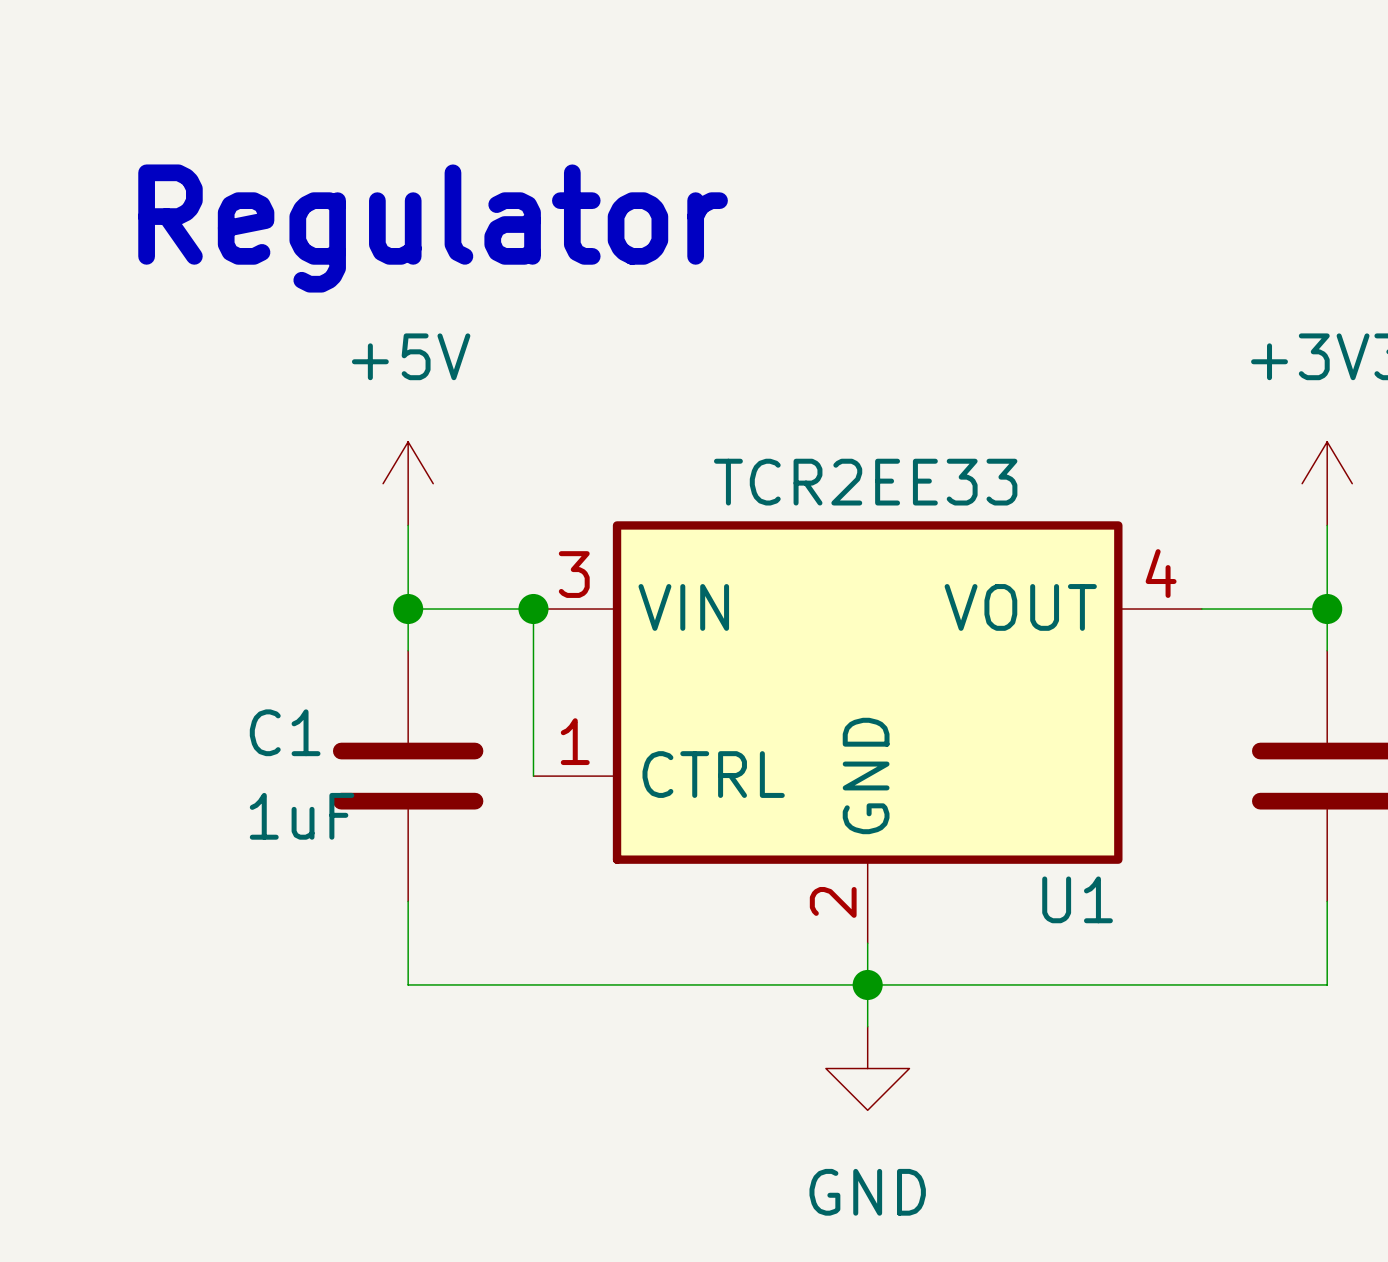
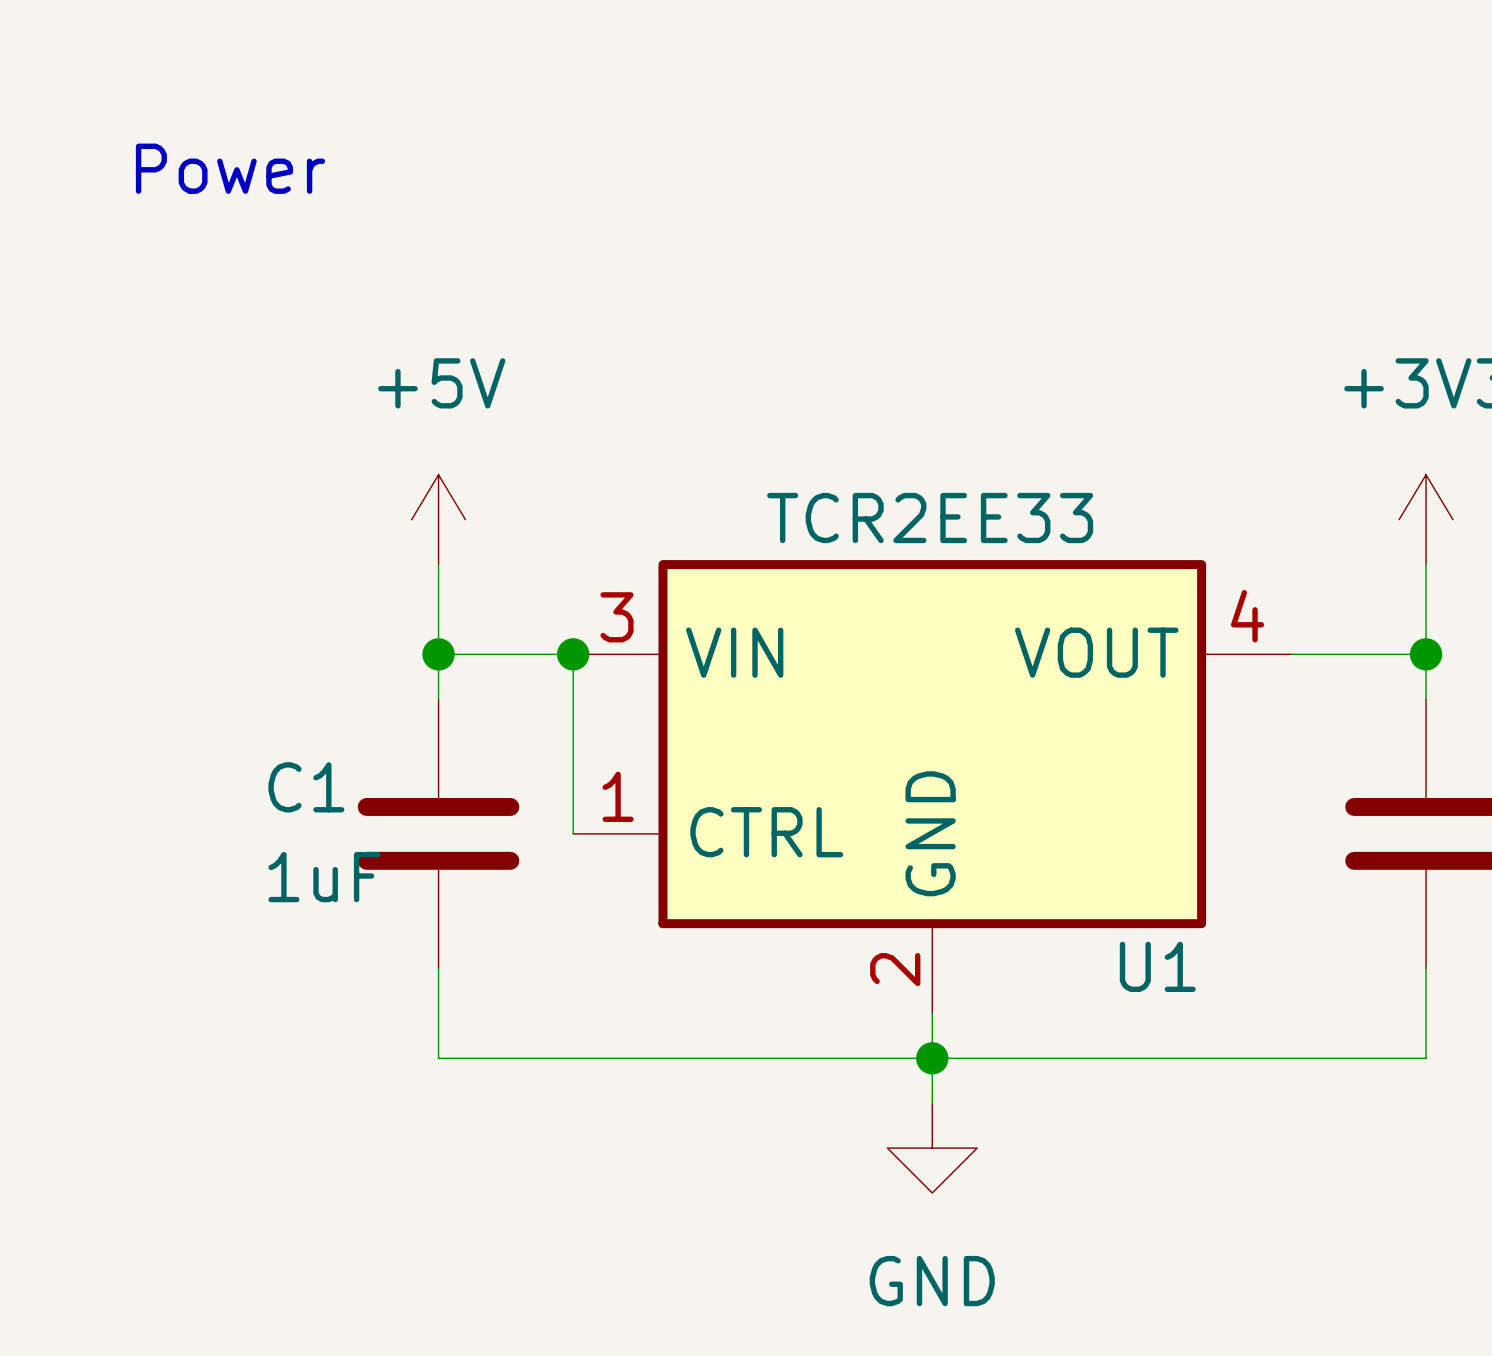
text: none -> Power (230, 168)
text: Regulator (433, 228) -> none

